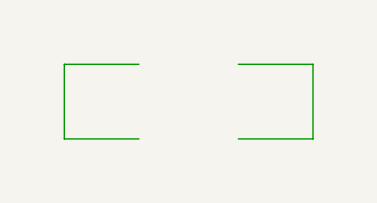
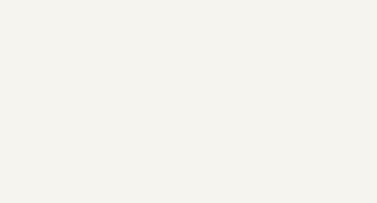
wire: (138, 64) (64, 64) (64, 138) (138, 138) -> none
wire: (238, 64) (312, 64) (312, 138) (238, 138) -> none

